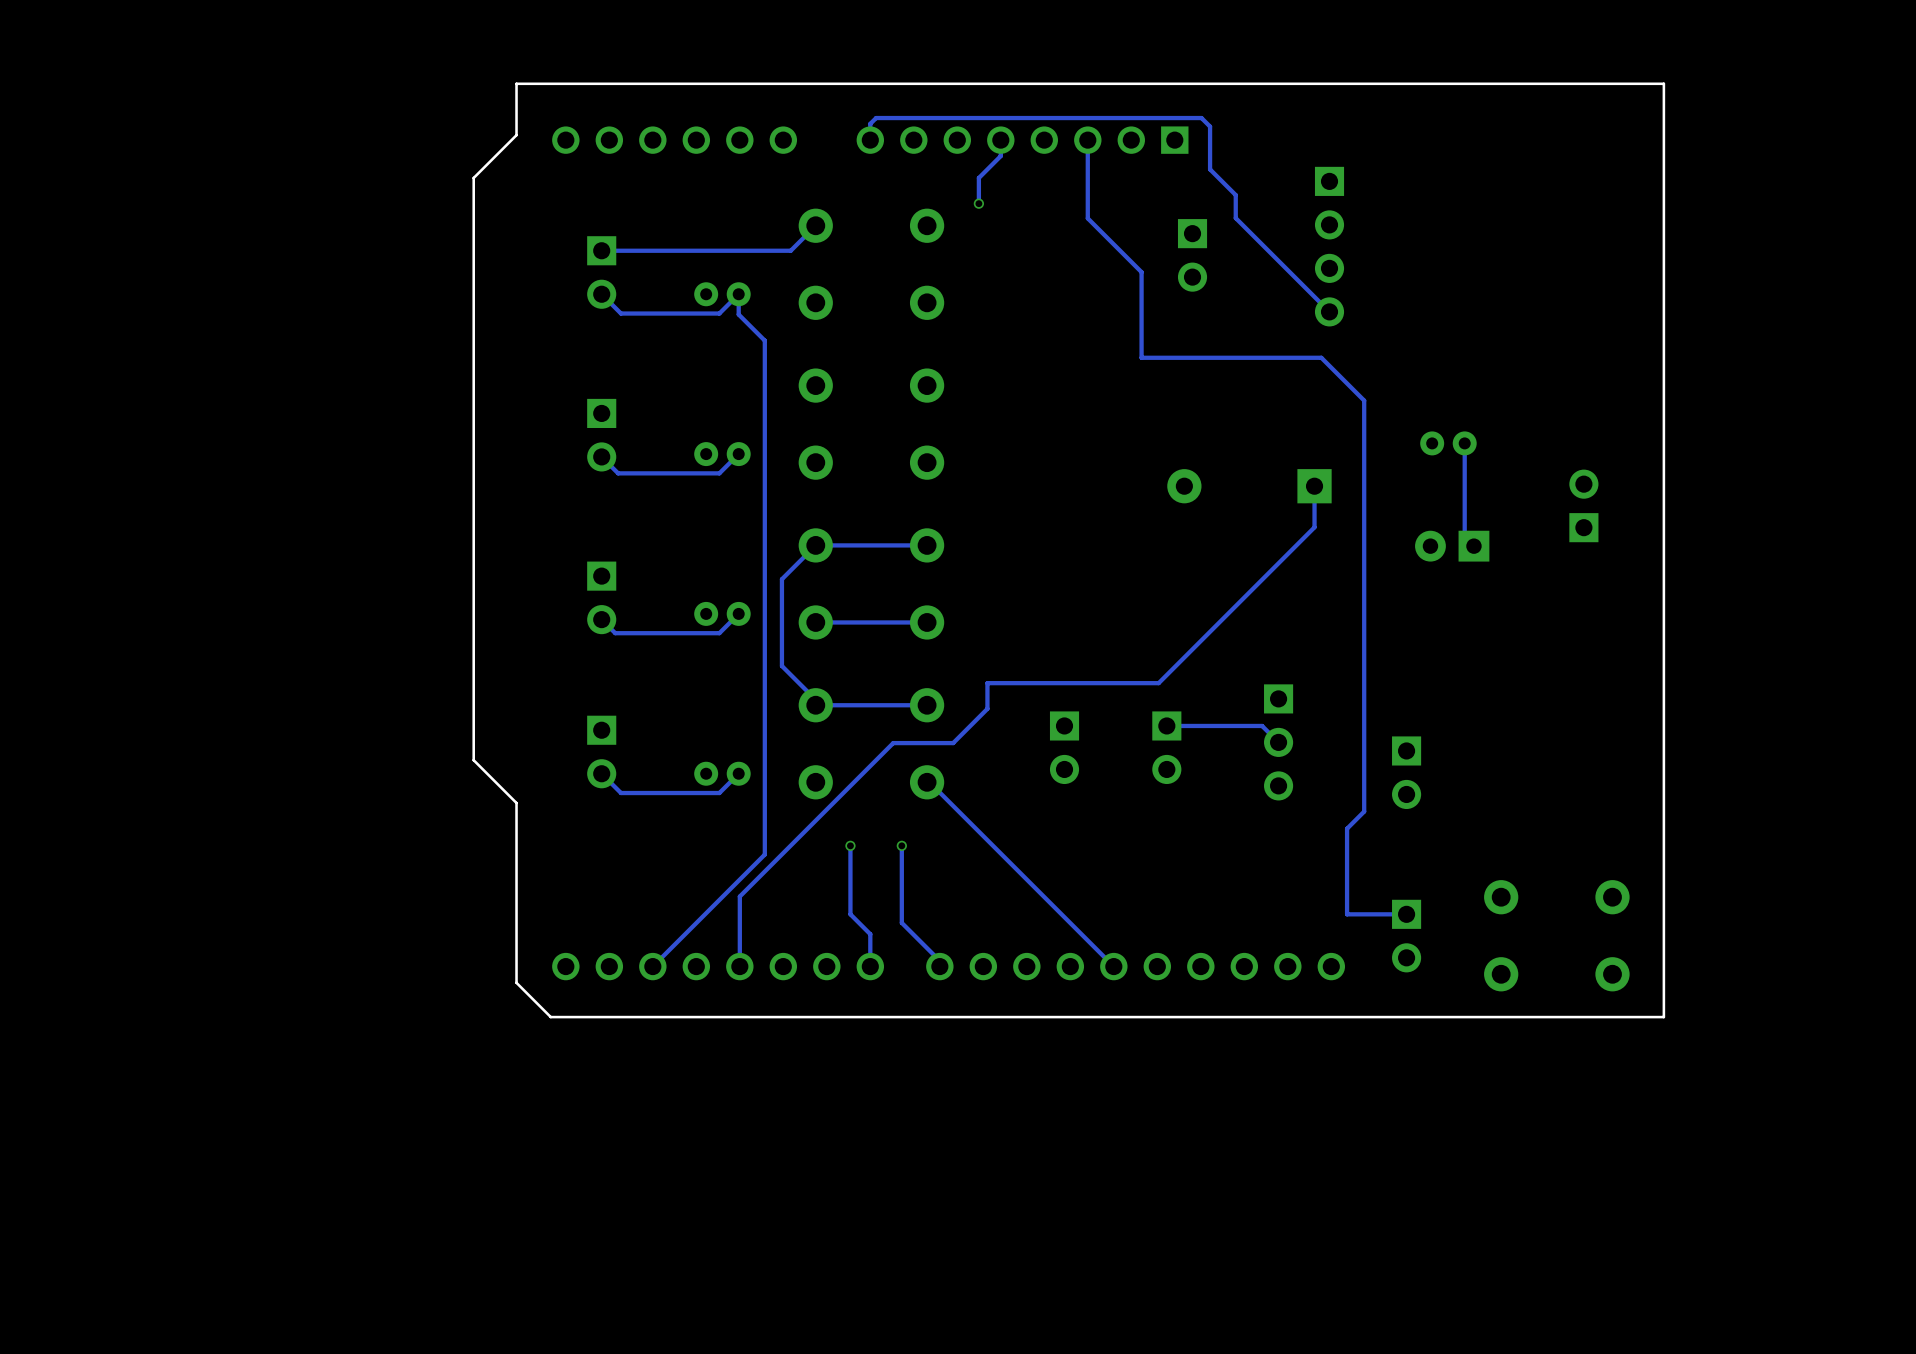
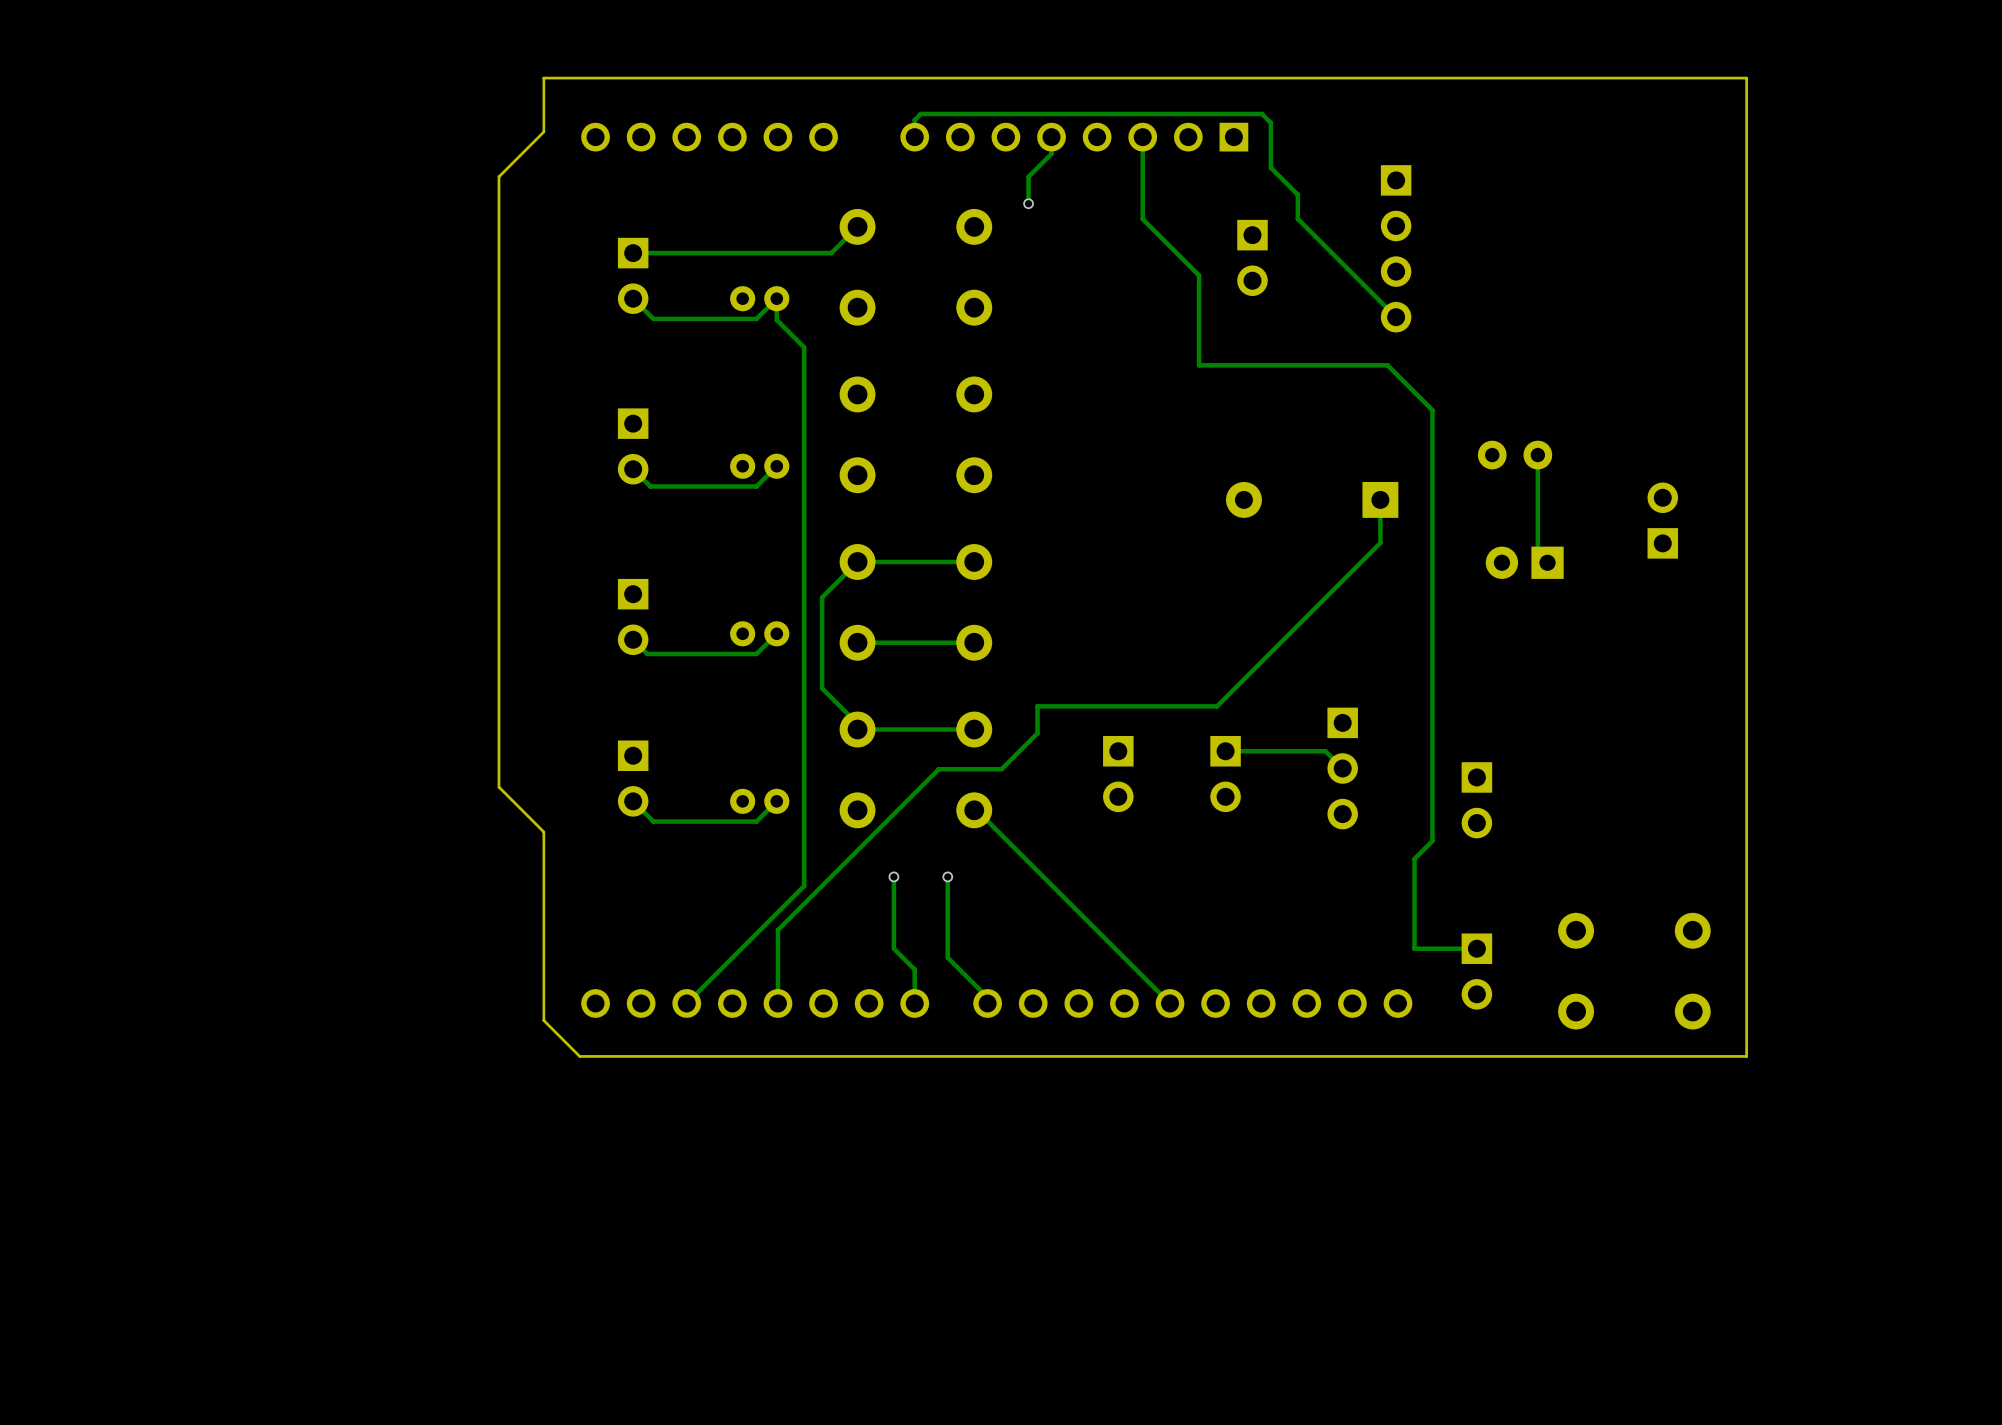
part footprint: [1420, 431, 1477, 456] -> [1477, 440, 1553, 470]

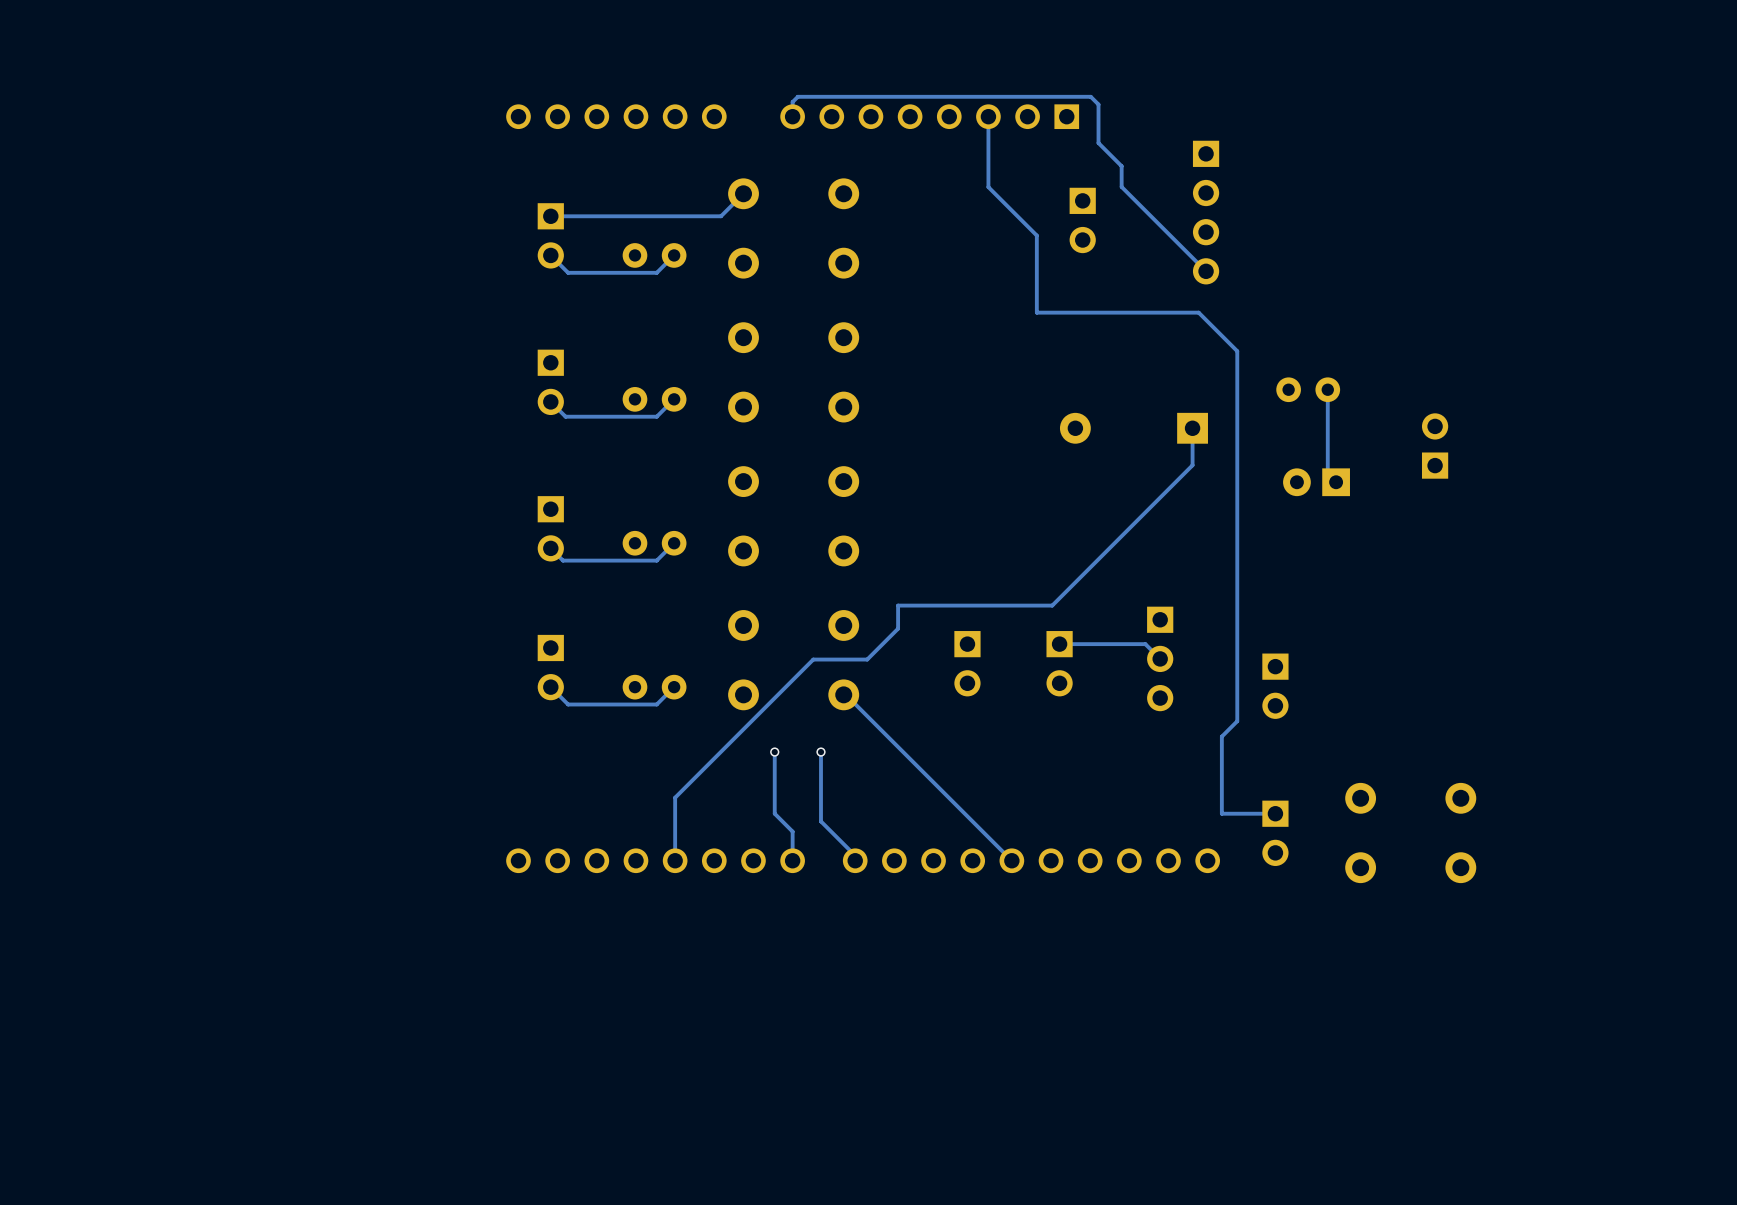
board edge: (1746, 78) (543, 78) (543, 131) (498, 176) (498, 787) (543, 832) (543, 1020) (579, 1056) (1746, 1056) (1746, 78) -> none
track: (1051, 137) (1051, 153) (1028, 176) (1028, 203) -> none
via: (1028, 203) -> none
part footprint: [730, 286, 790, 312] -> [622, 243, 687, 268]
track: (776, 298) (776, 319) (804, 347) (804, 886) (686, 1003) -> none
part footprint: [730, 453, 790, 479] -> [622, 387, 687, 412]
track: (974, 561) (857, 561) (822, 597) (822, 688) (857, 723) (857, 729) (974, 729) -> none
part footprint: [730, 621, 790, 647] -> [622, 530, 687, 556]
track: (974, 642) (857, 642) -> none
part footprint: [730, 788, 790, 814] -> [622, 674, 687, 700]

